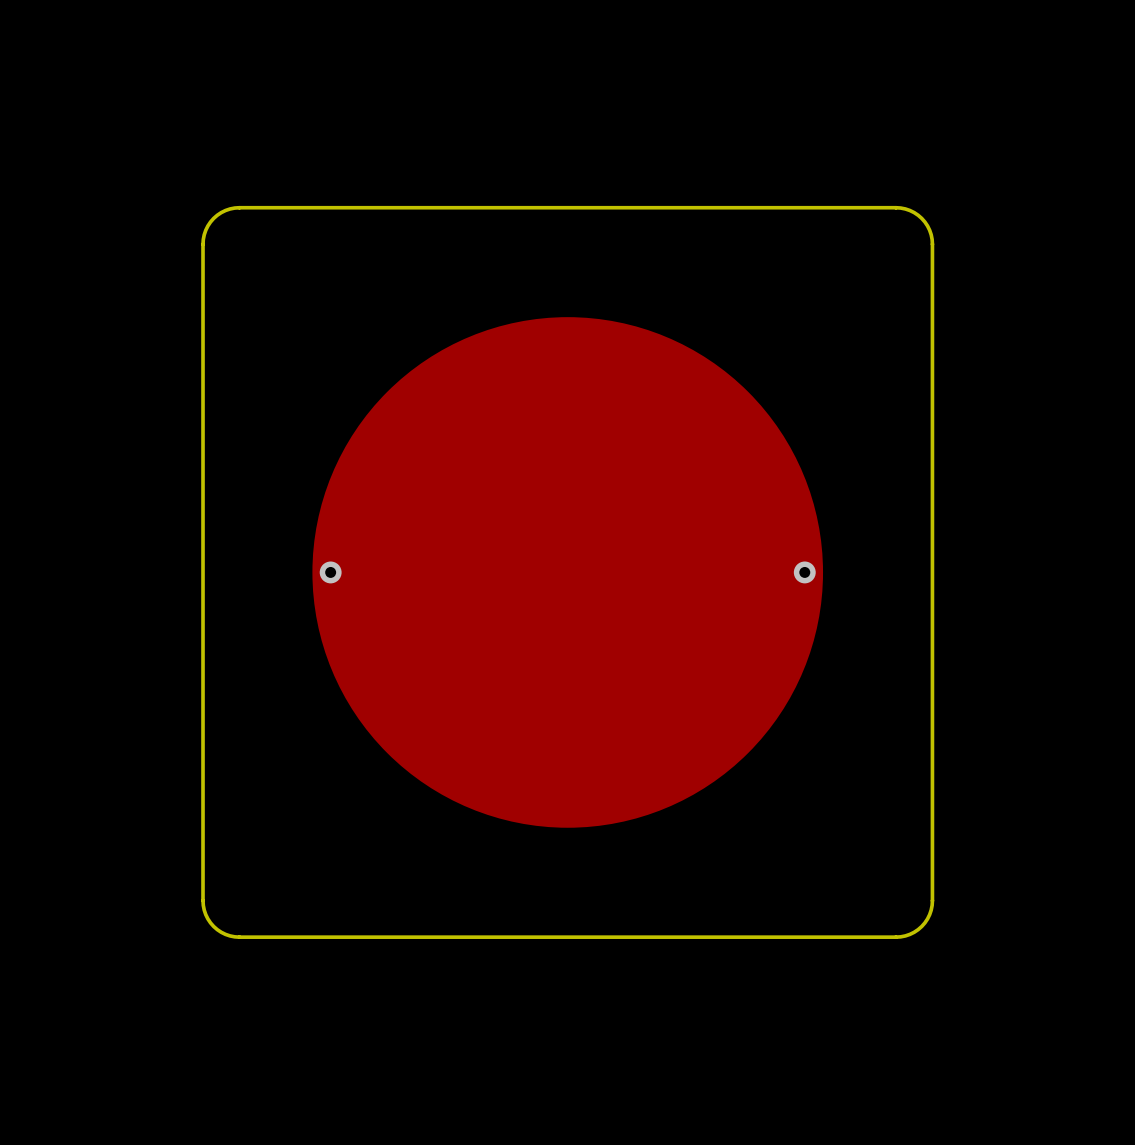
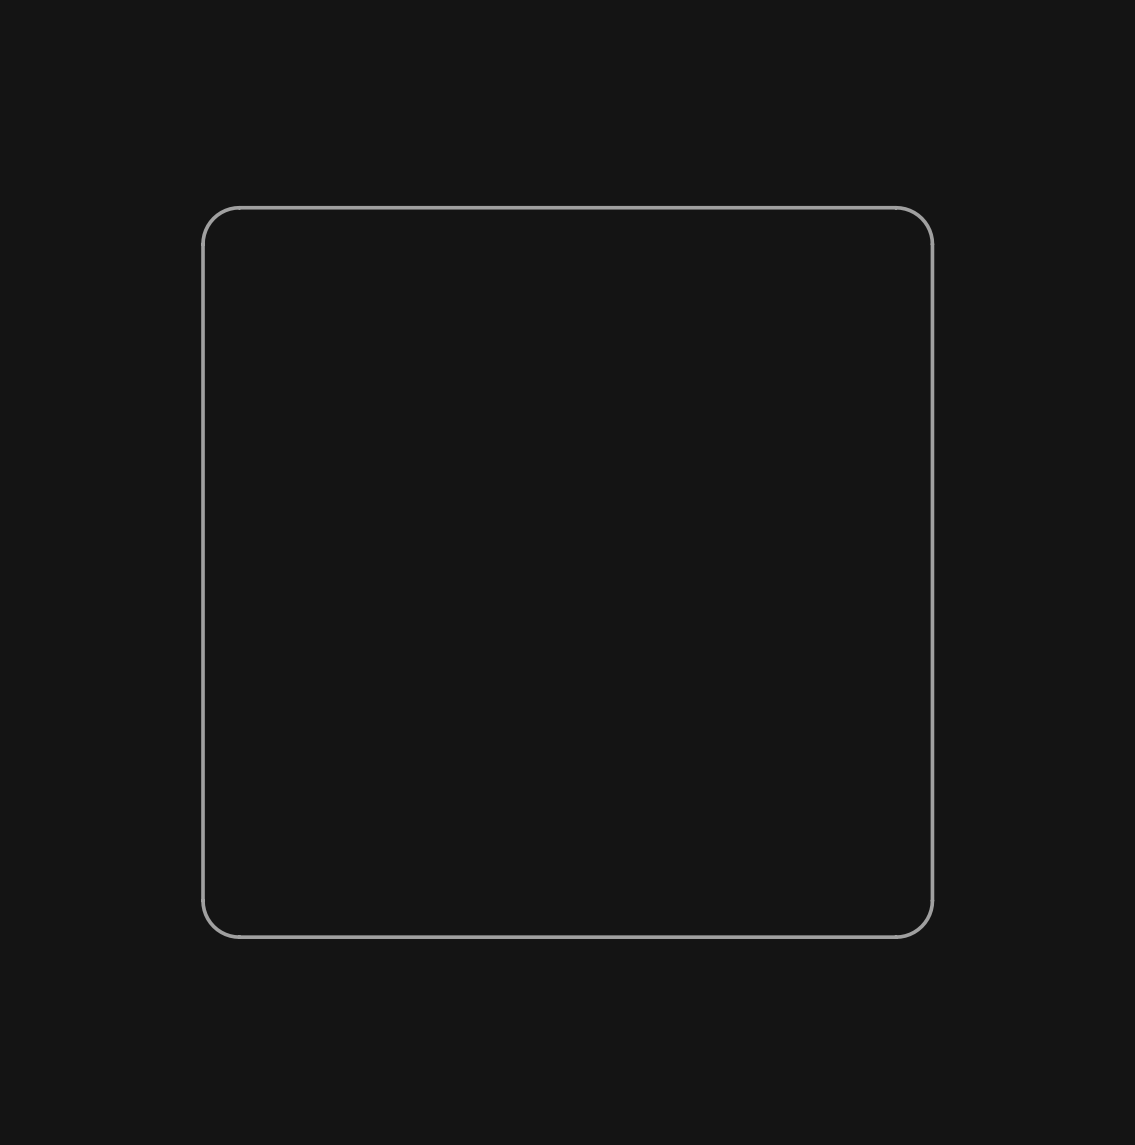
drawing: [312, 317, 824, 828] -> none
via: (330, 572) -> none
via: (804, 572) -> none

